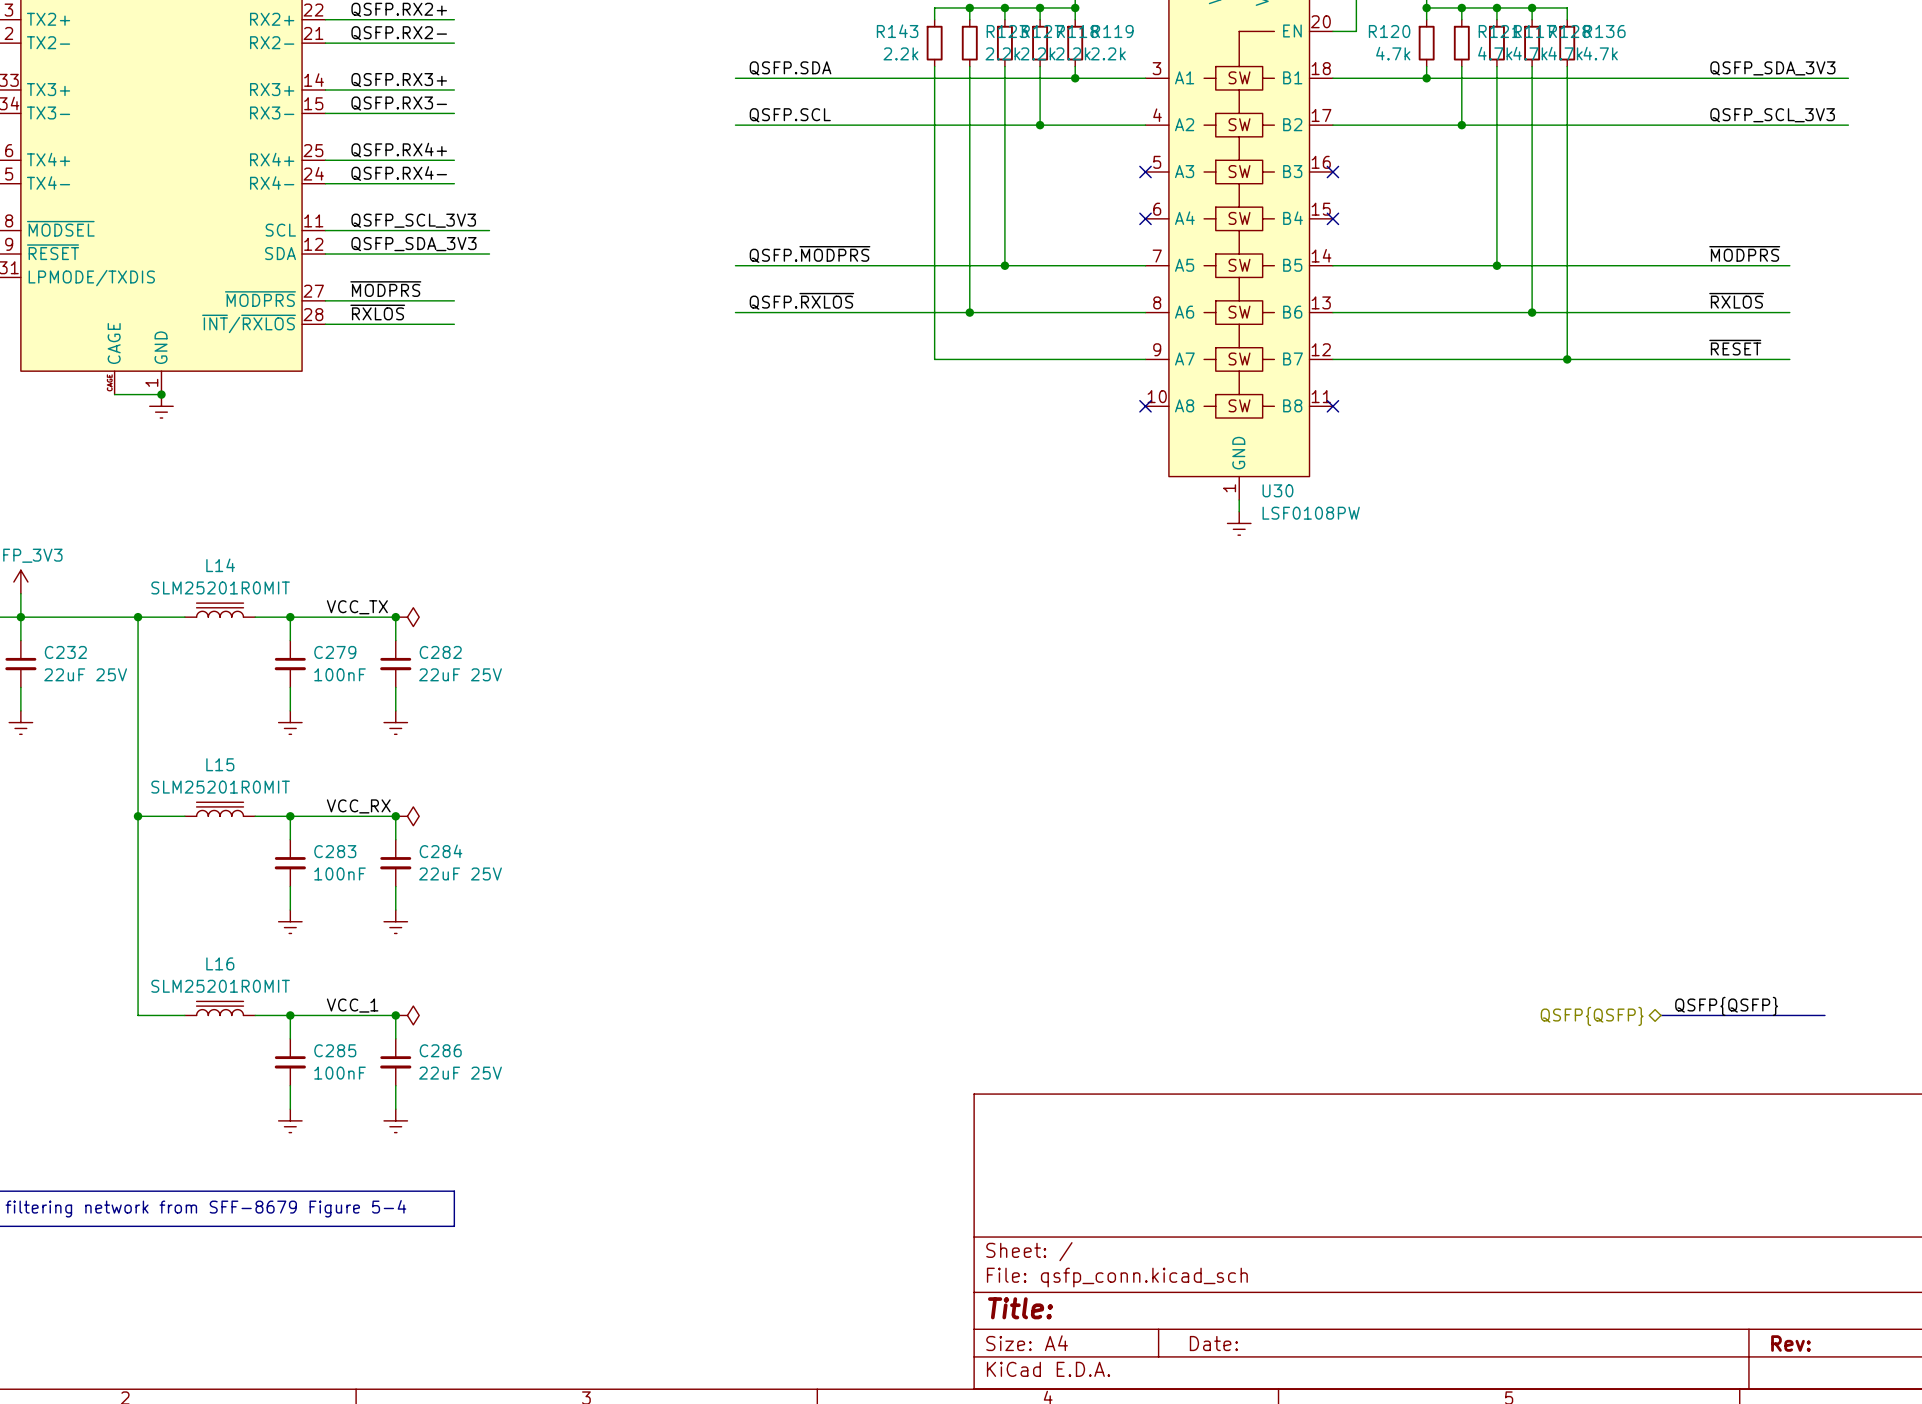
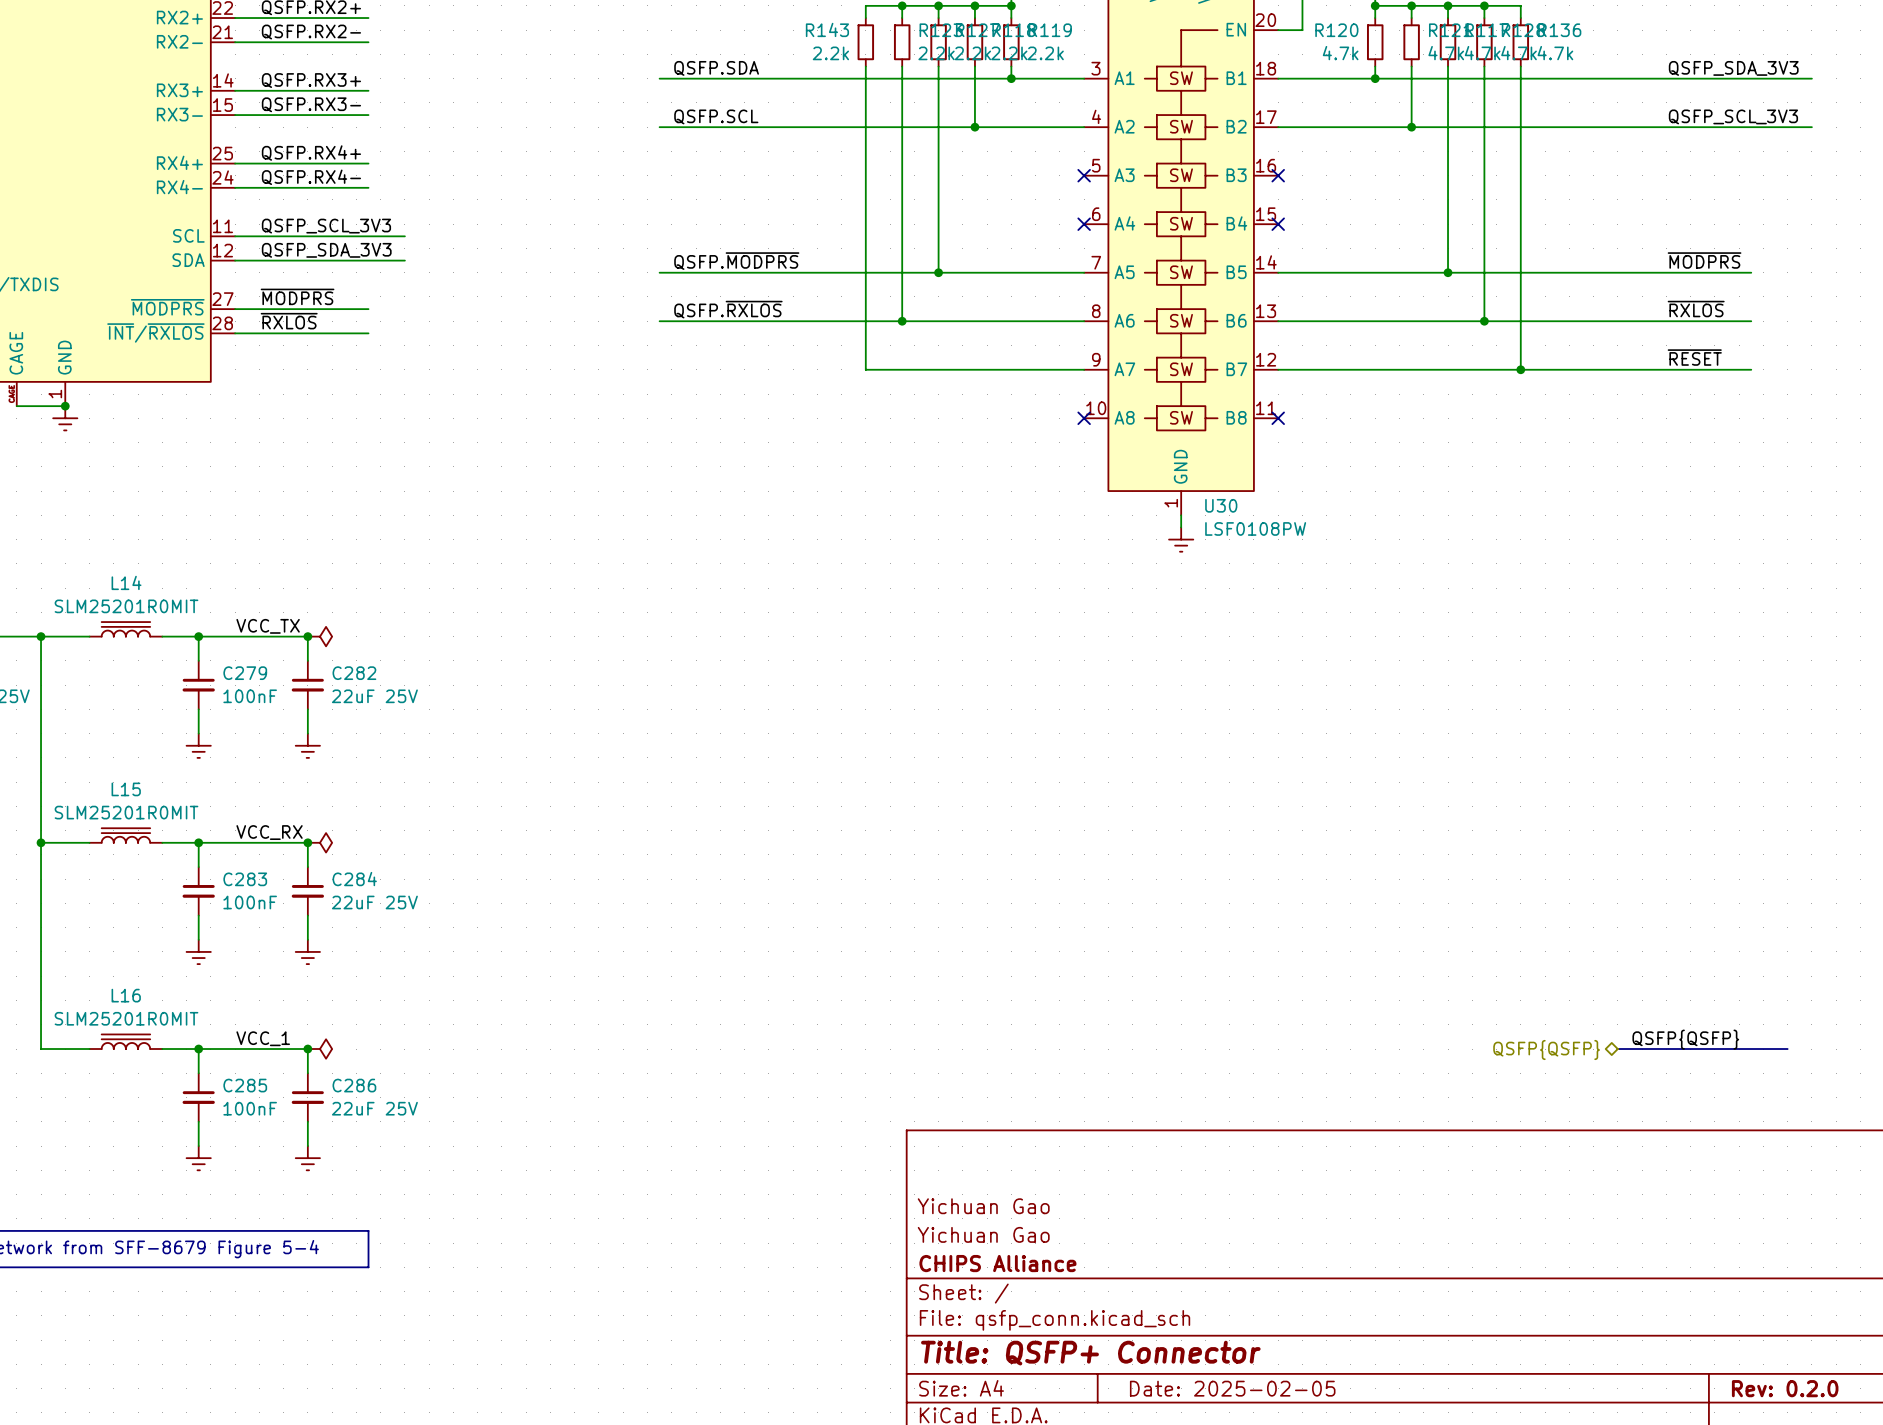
title block: none -> Yichuan Gao (983, 1206)
title block: none -> Yichuan Gao (983, 1234)
title block: none -> CHIPS Alliance (997, 1263)
title block: Title: (1020, 1308) -> Title: QSFP+ Connector (1090, 1353)
title block: Date: (1213, 1343) -> Date: 2025-02-05 (1232, 1388)
title block: Rev: (1790, 1343) -> Rev: 0.2.0 (1785, 1388)

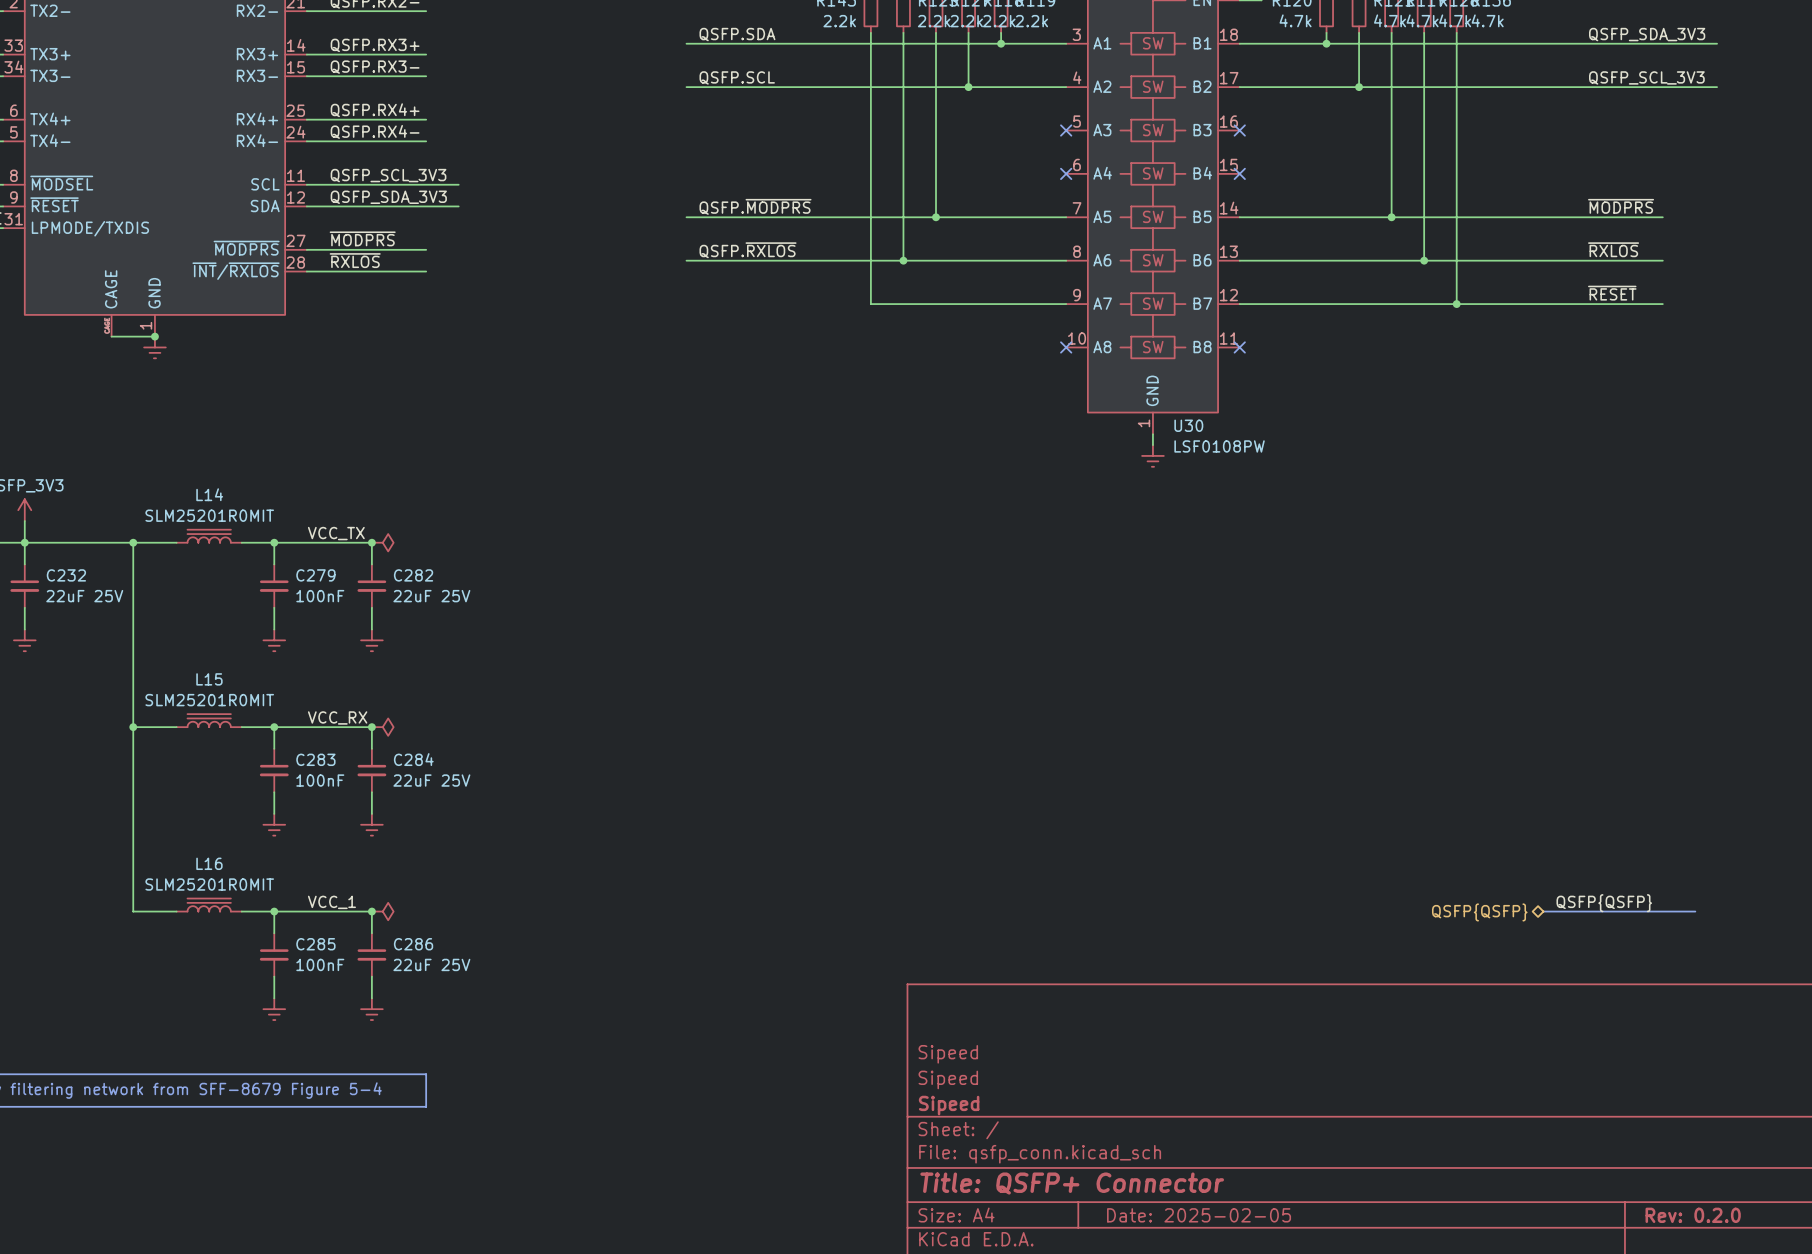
title block: Yichuan Gao (983, 1206) -> Sipeed (948, 1054)
title block: Yichuan Gao (983, 1234) -> Sipeed (948, 1079)
title block: CHIPS Alliance (997, 1263) -> Sipeed (949, 1105)

